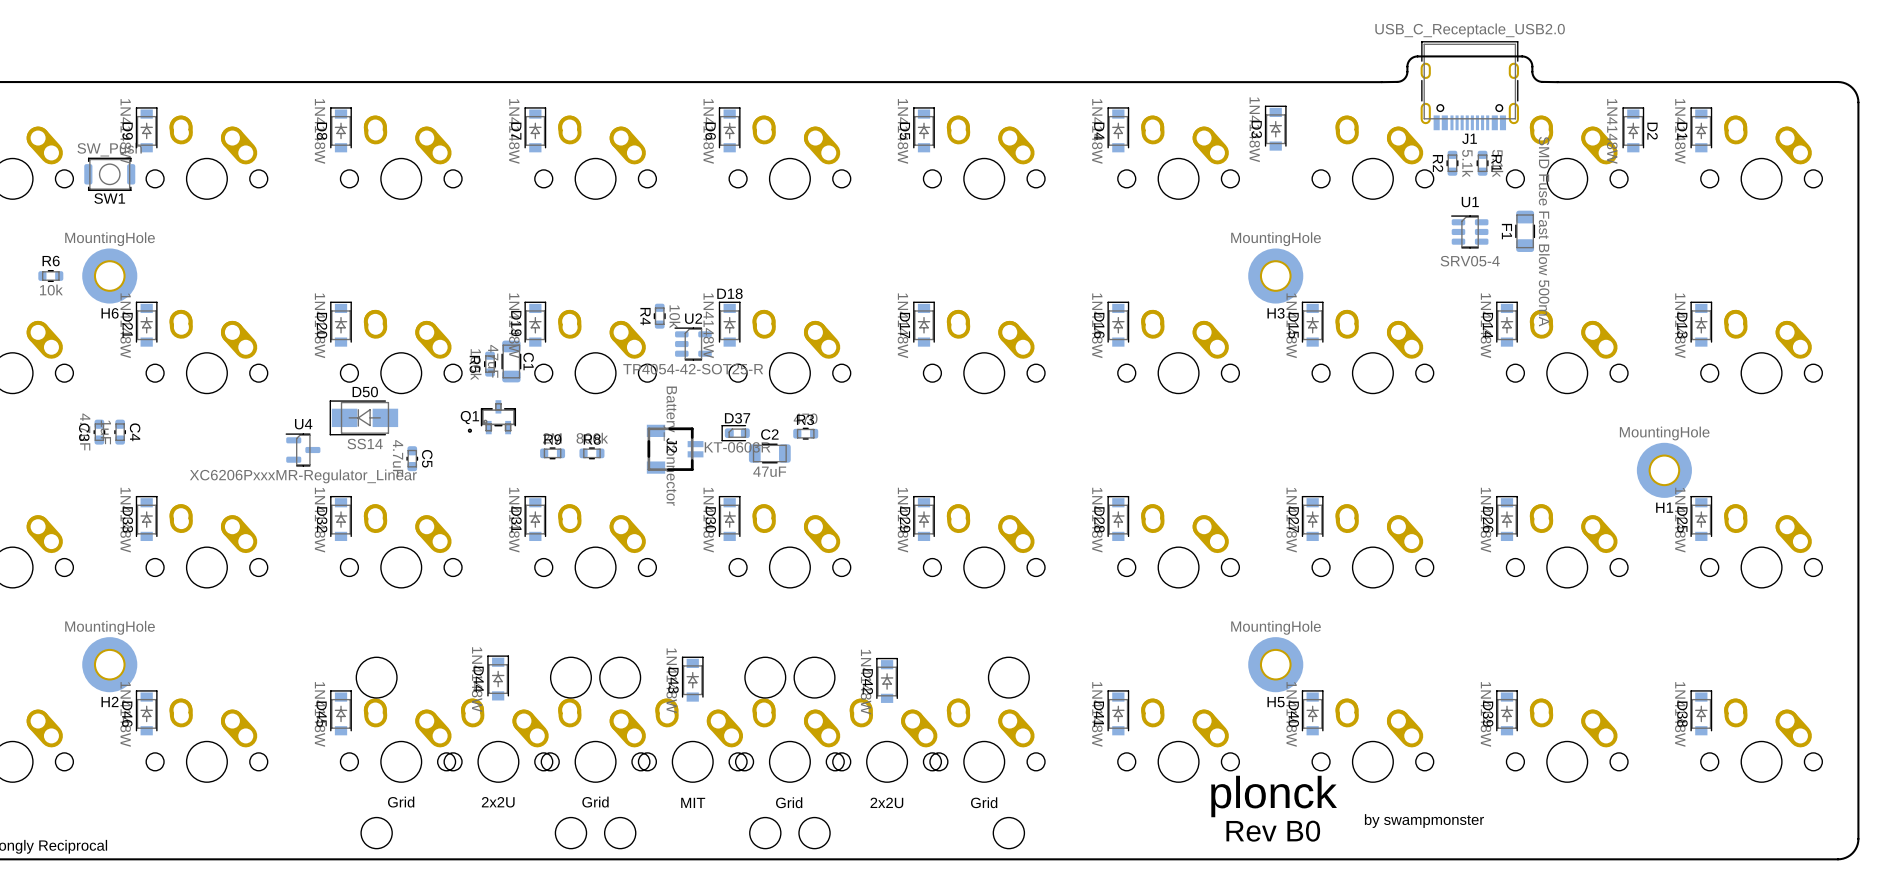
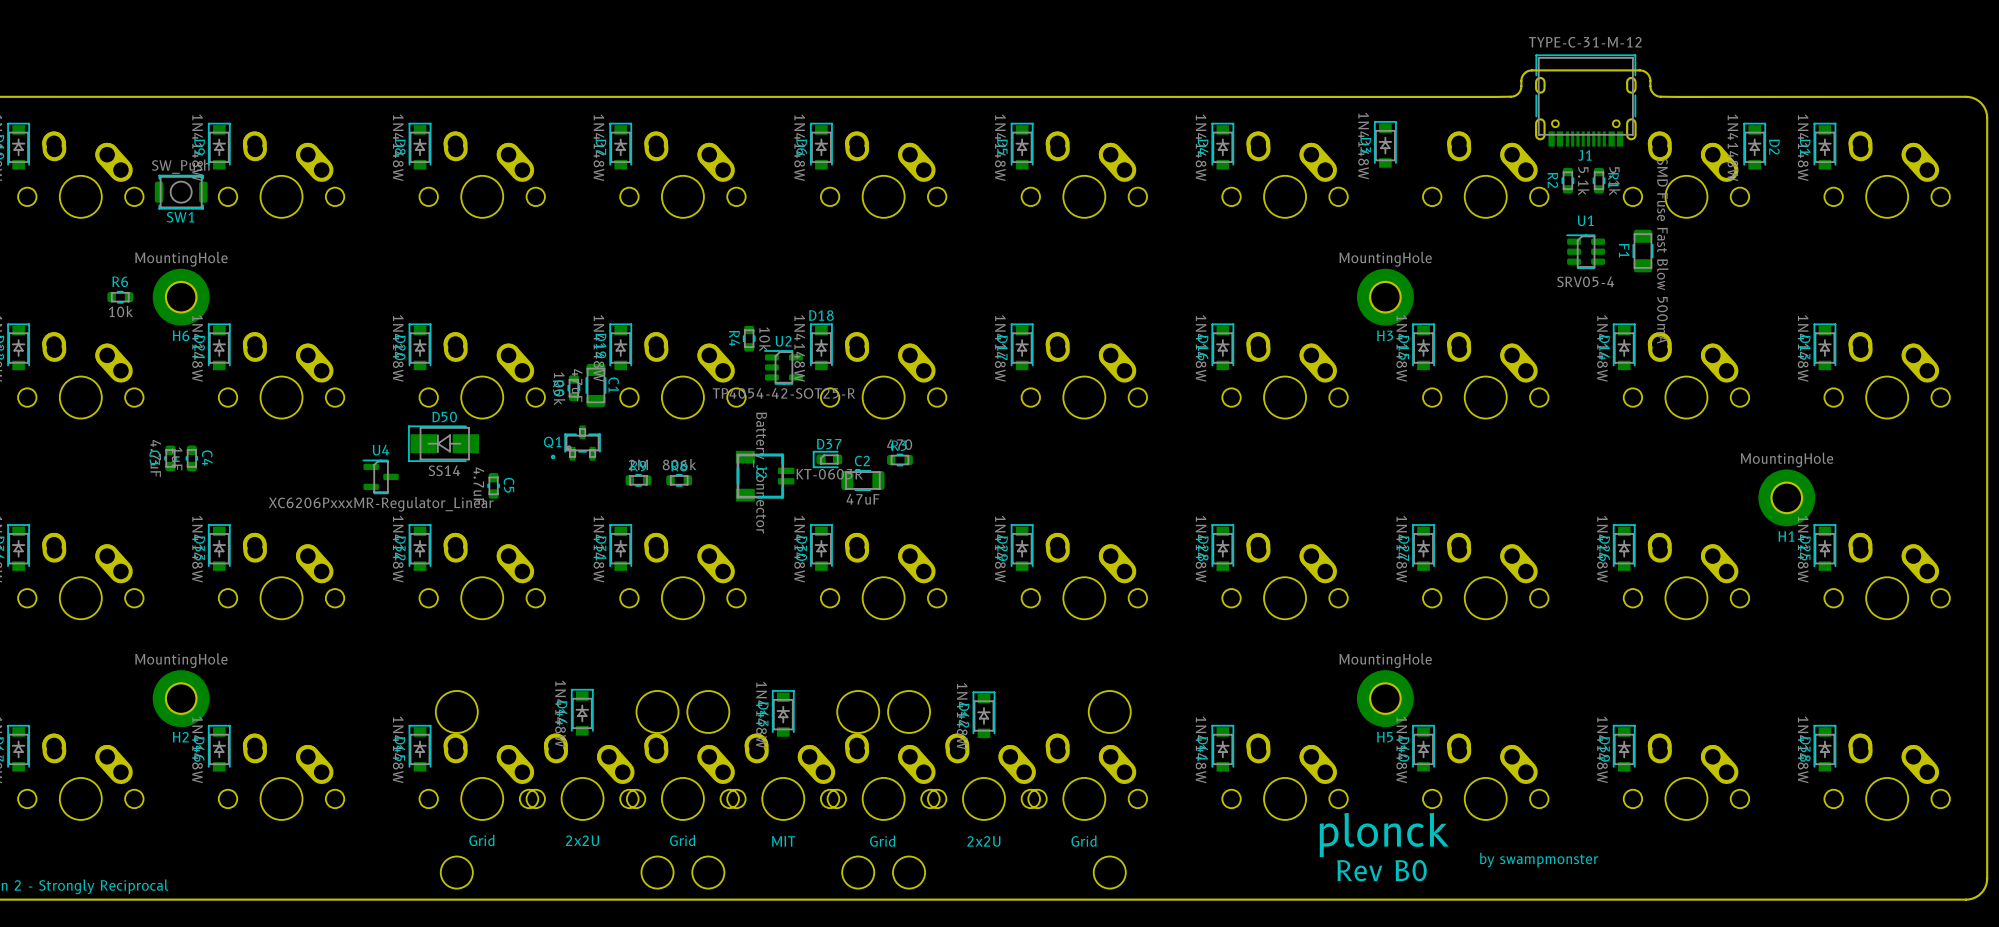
J1 value: USB_C_Receptacle_USB2.0 (1470, 30) -> TYPE-C-31-M-12 (1585, 42)

